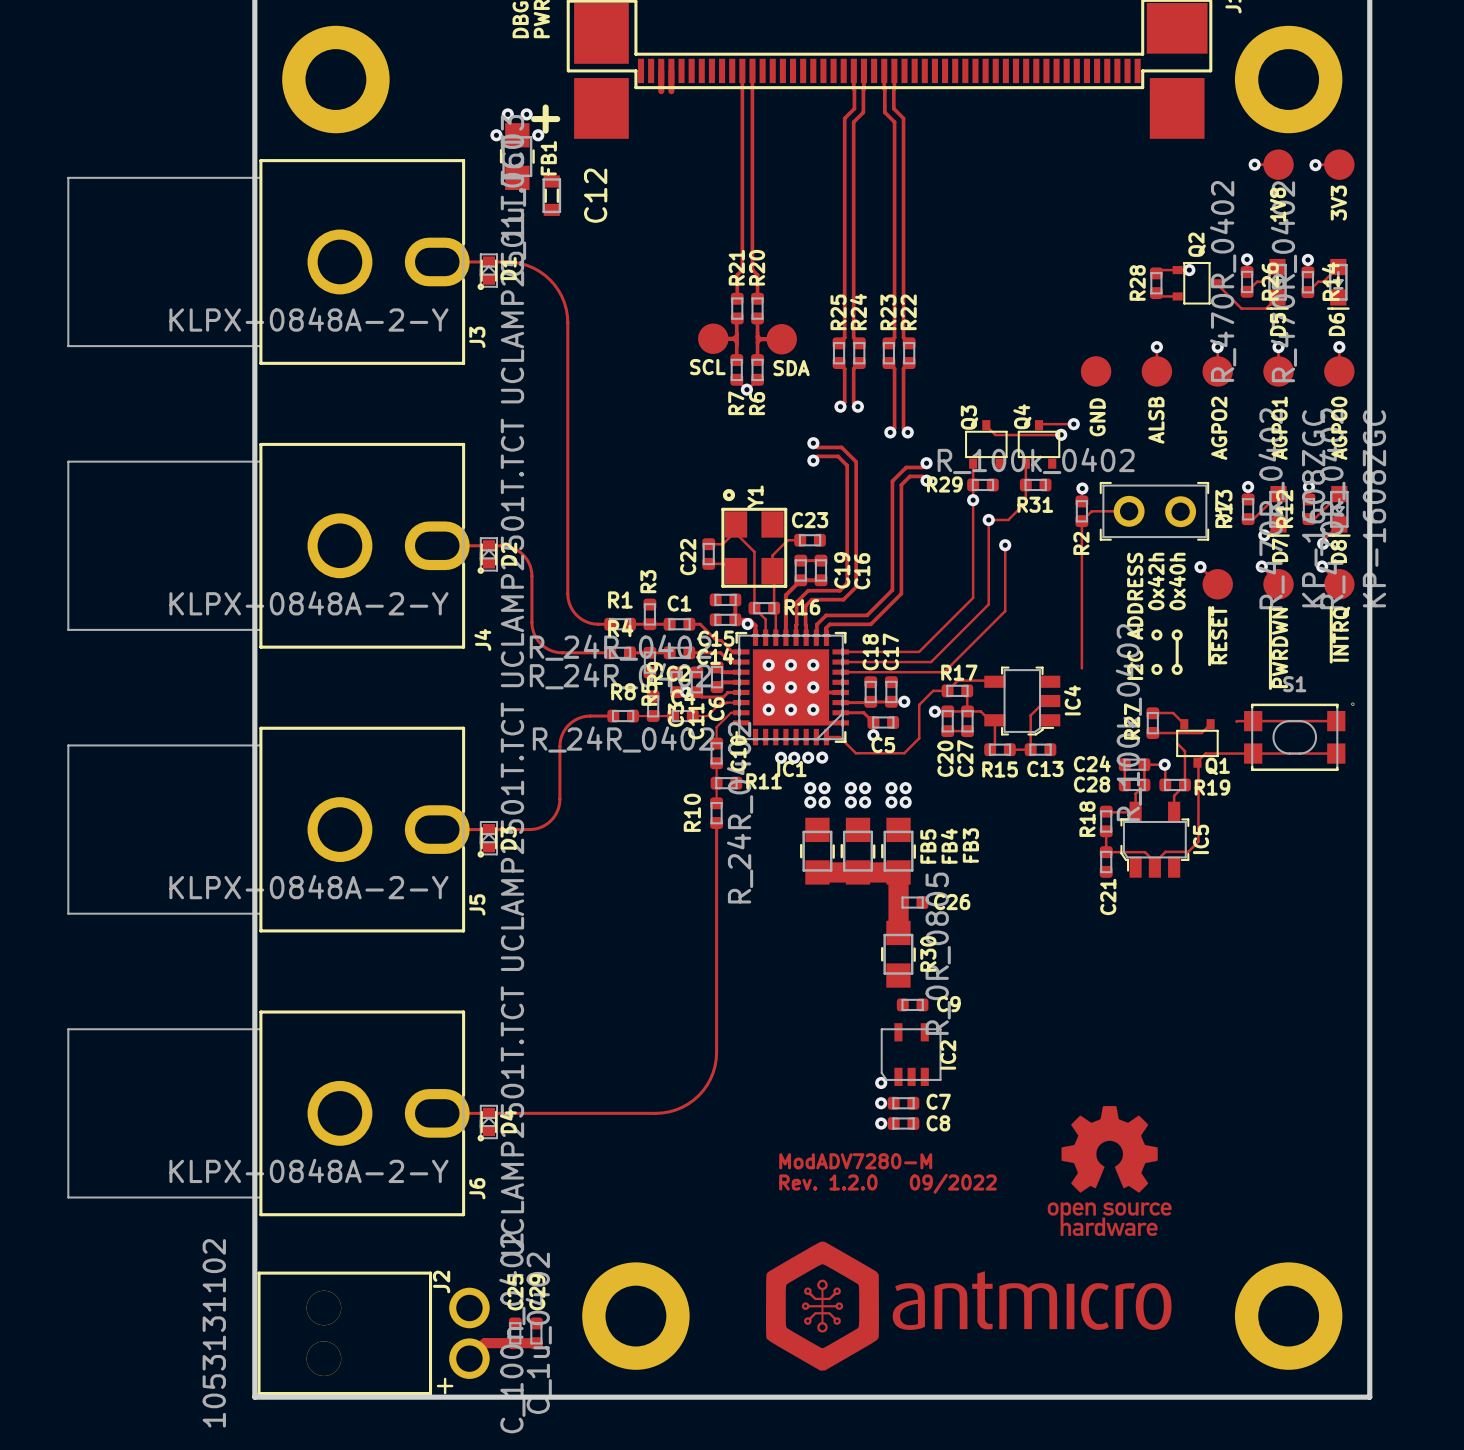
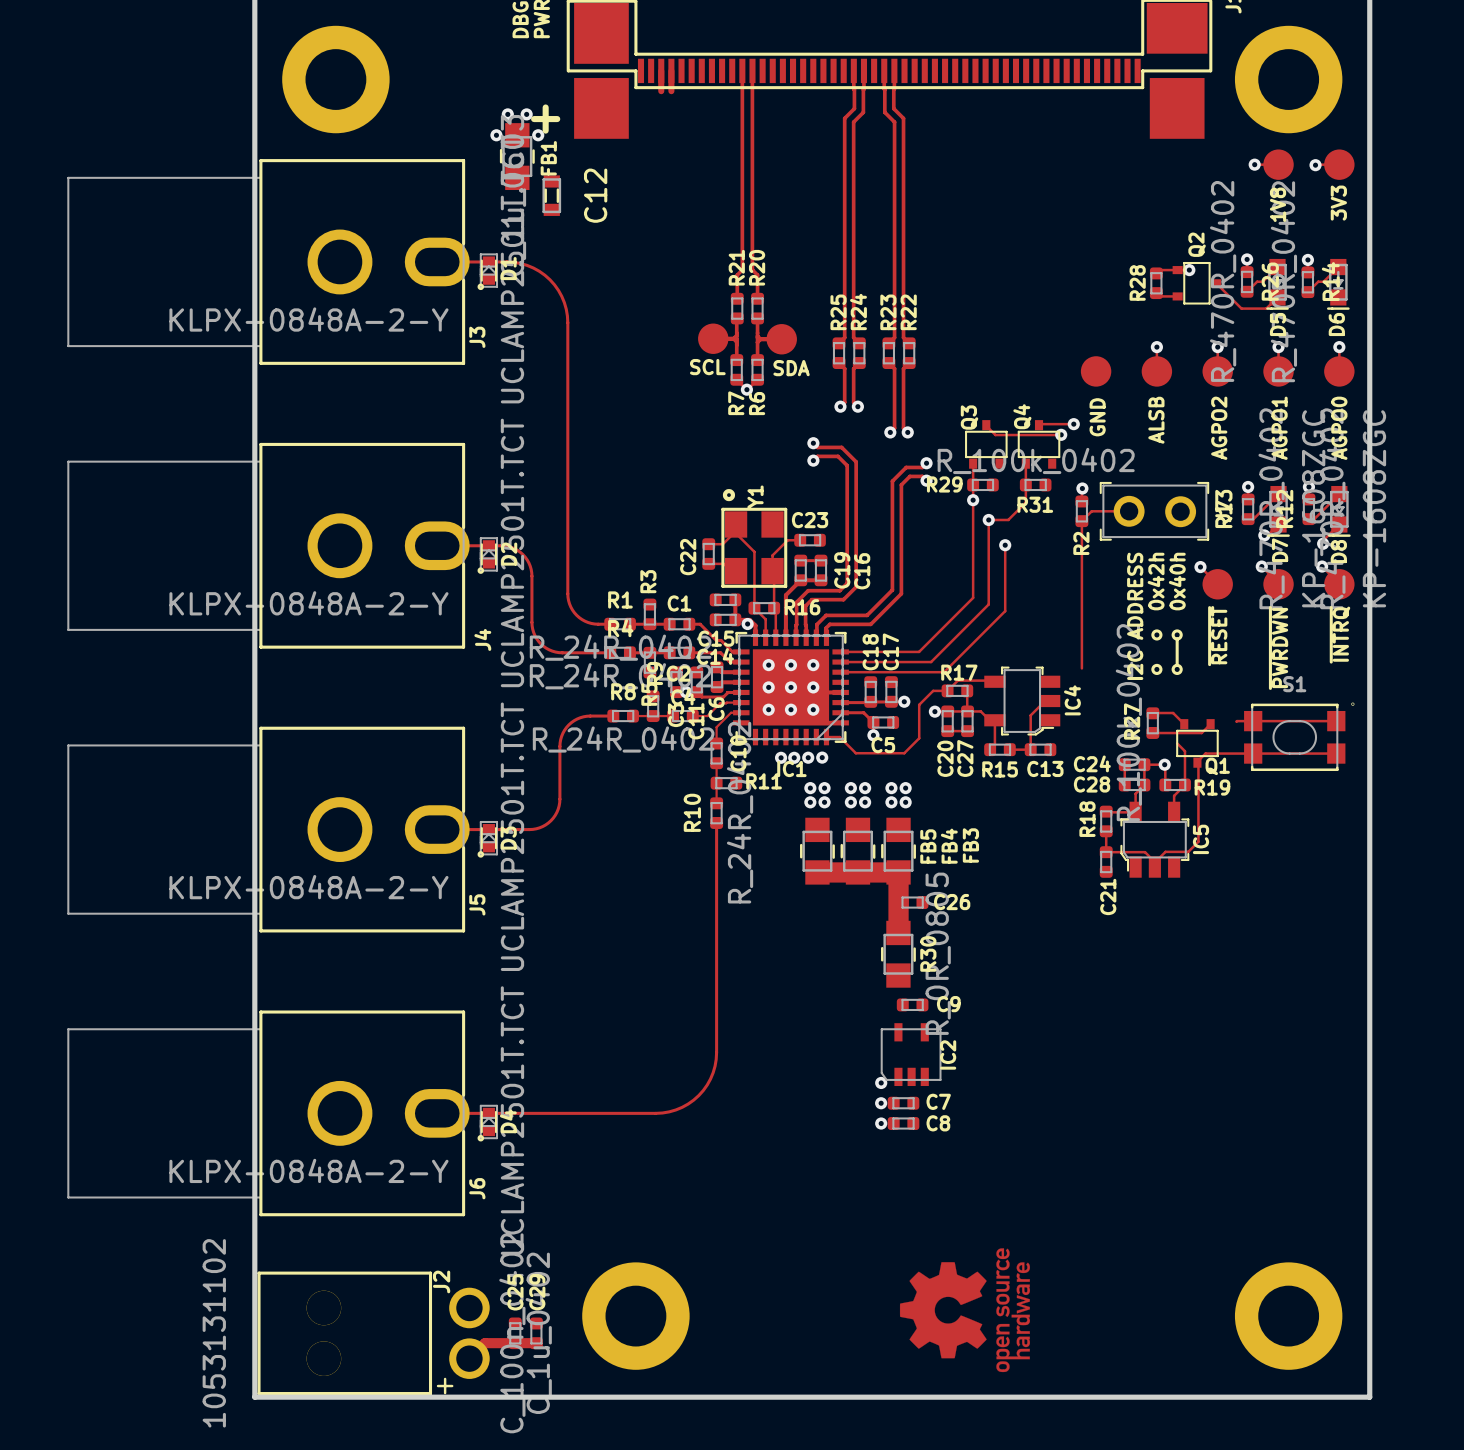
drawing: [1047, 1105, 1172, 1237] -> none
text: ModADV7280-M (855, 1161) -> none
text: Rev. 1.2.0 09/2022 (888, 1183) -> none
drawing shape: [766, 1241, 1172, 1371] -> [899, 1248, 1030, 1373]

